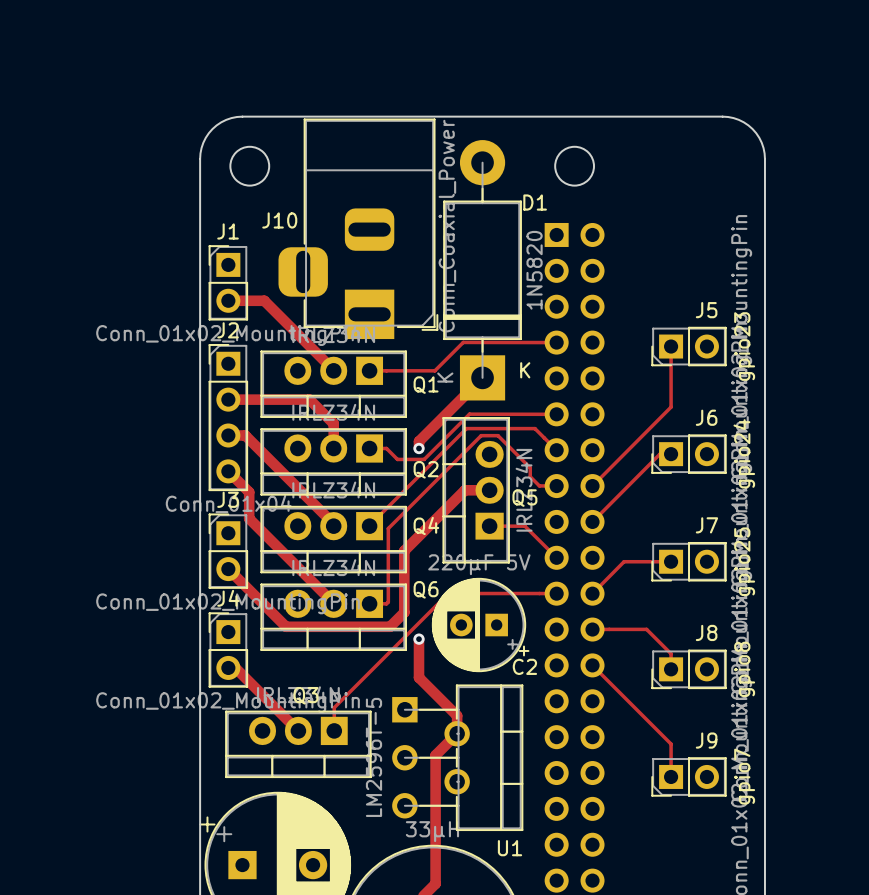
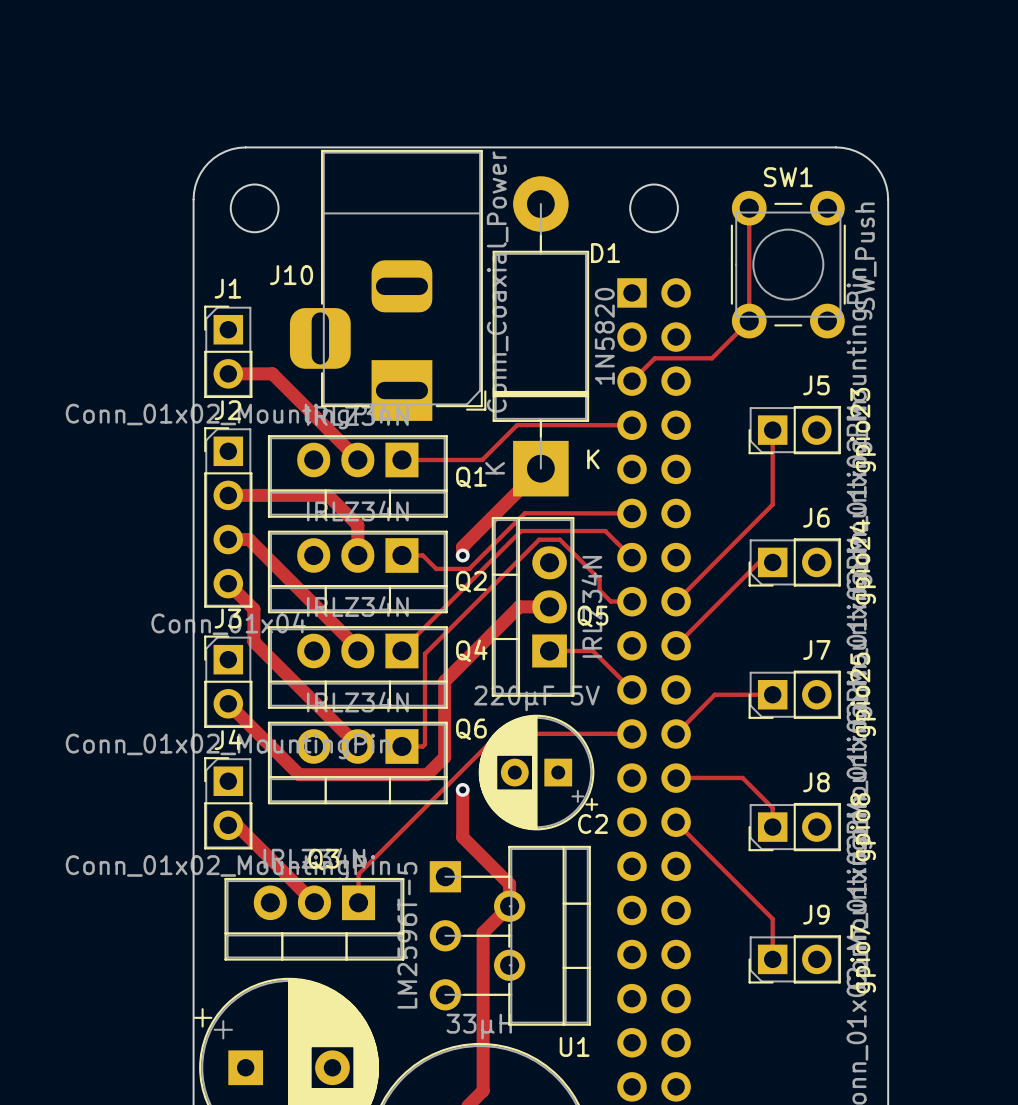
track: none -> (749, 208) (749, 321) (712, 358) (654, 358) (631, 381)
SW1: none -> SW_Push (788, 264)

